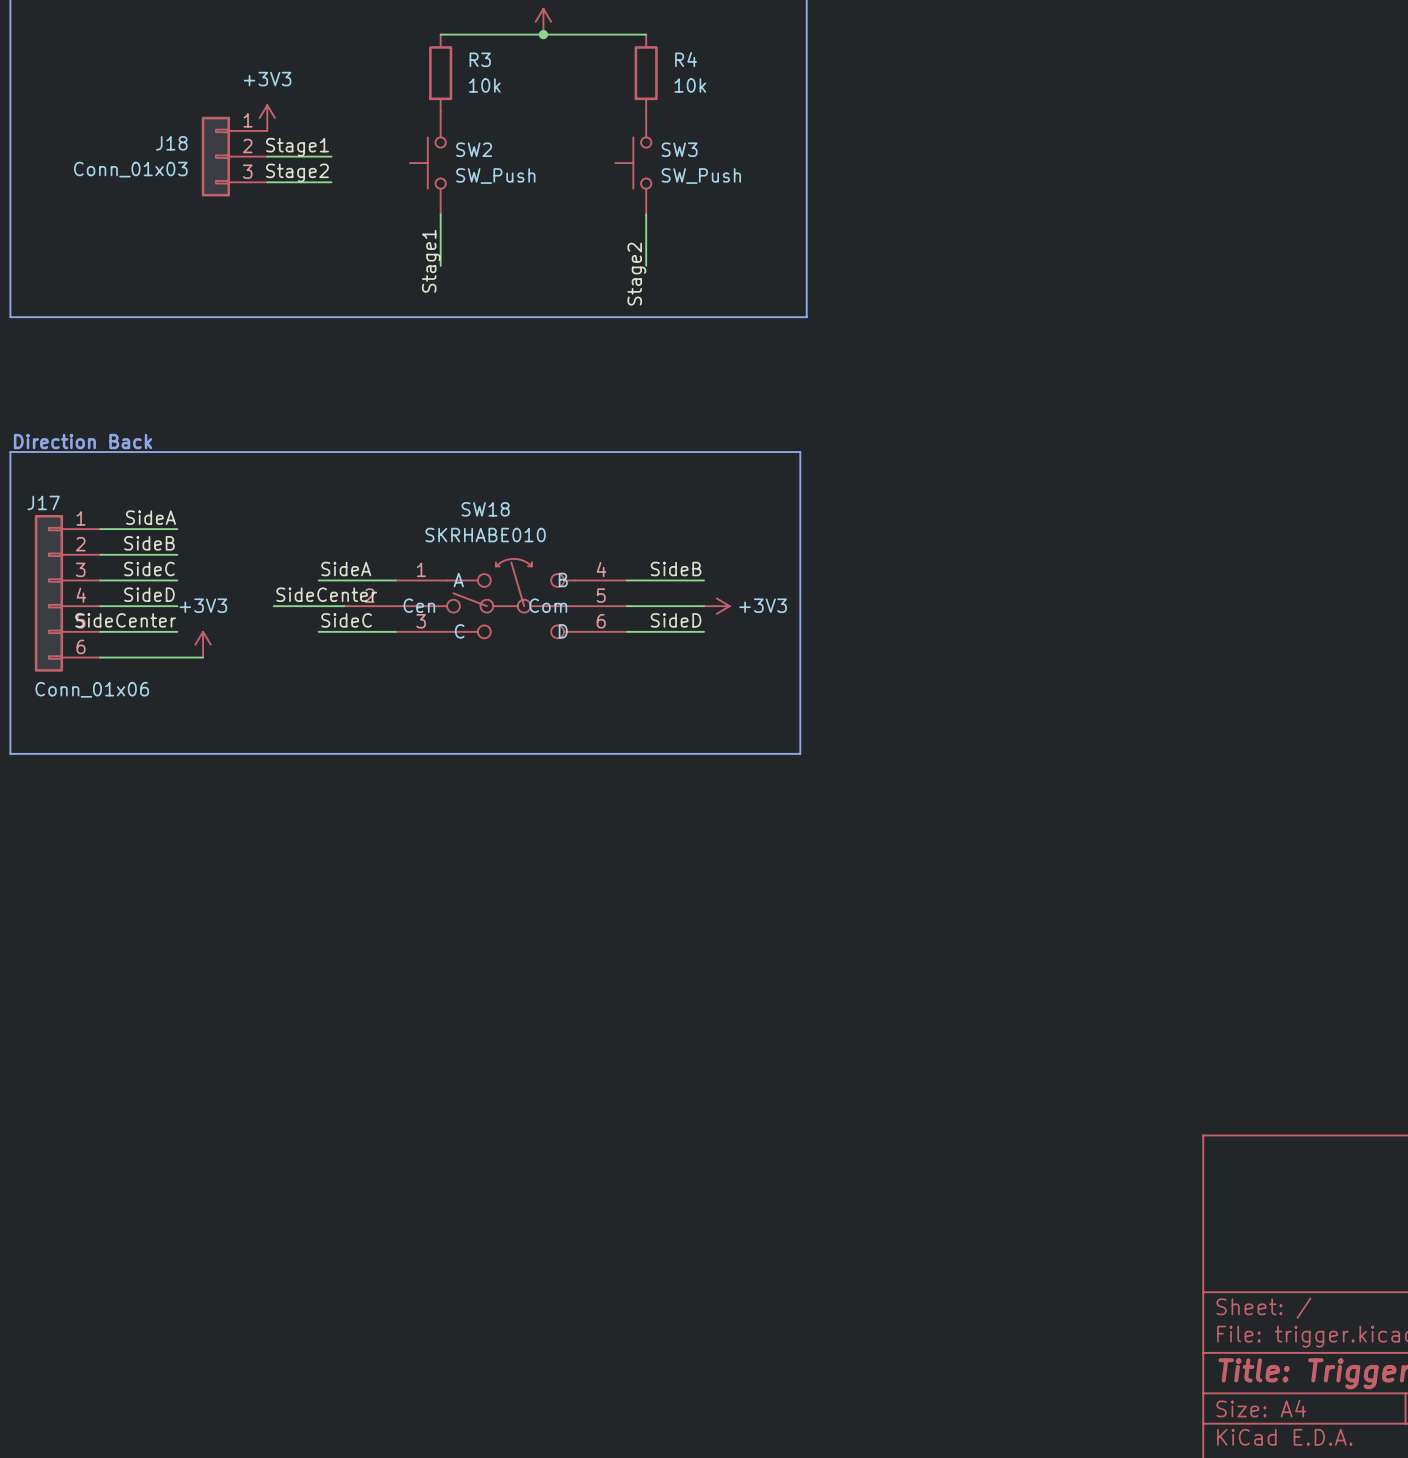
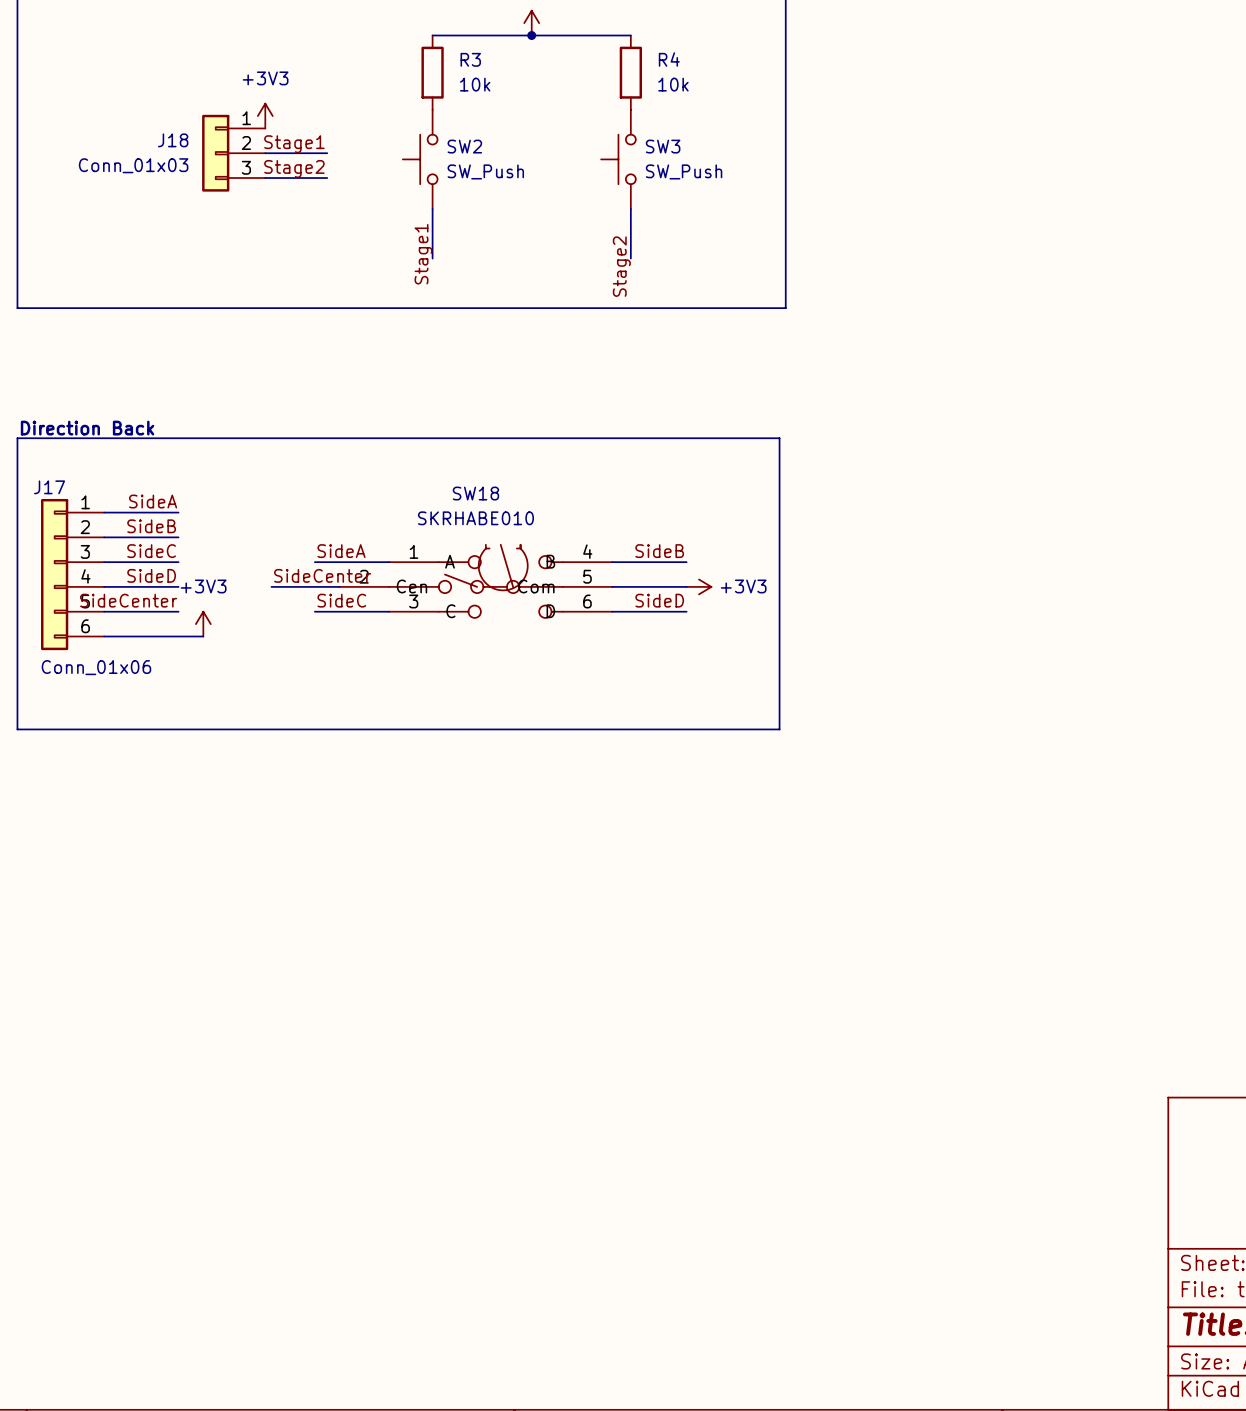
SW18 symbol: [344, 558, 627, 639] -> [339, 544, 613, 618]

